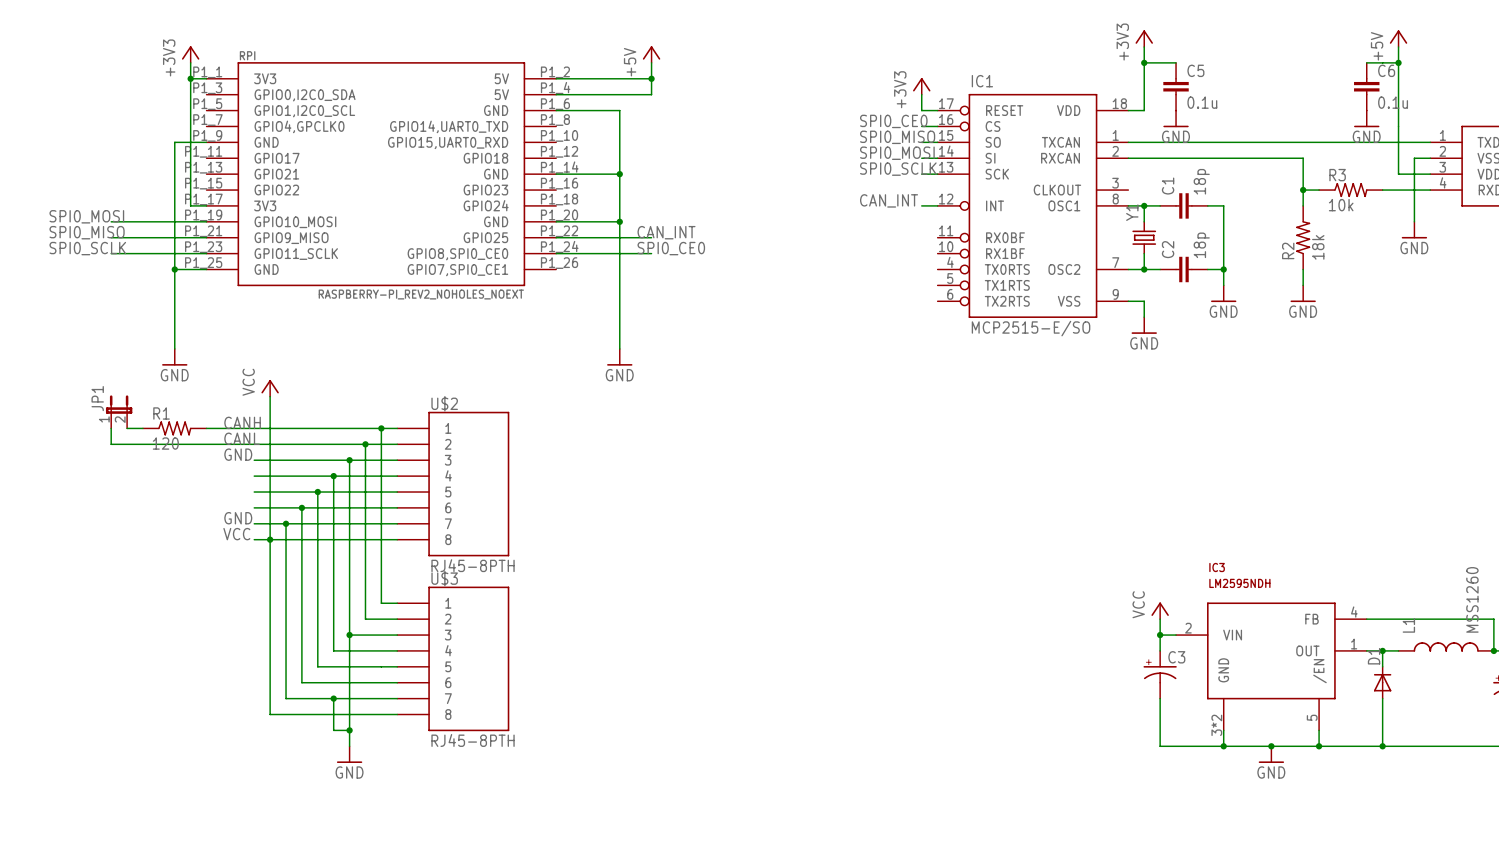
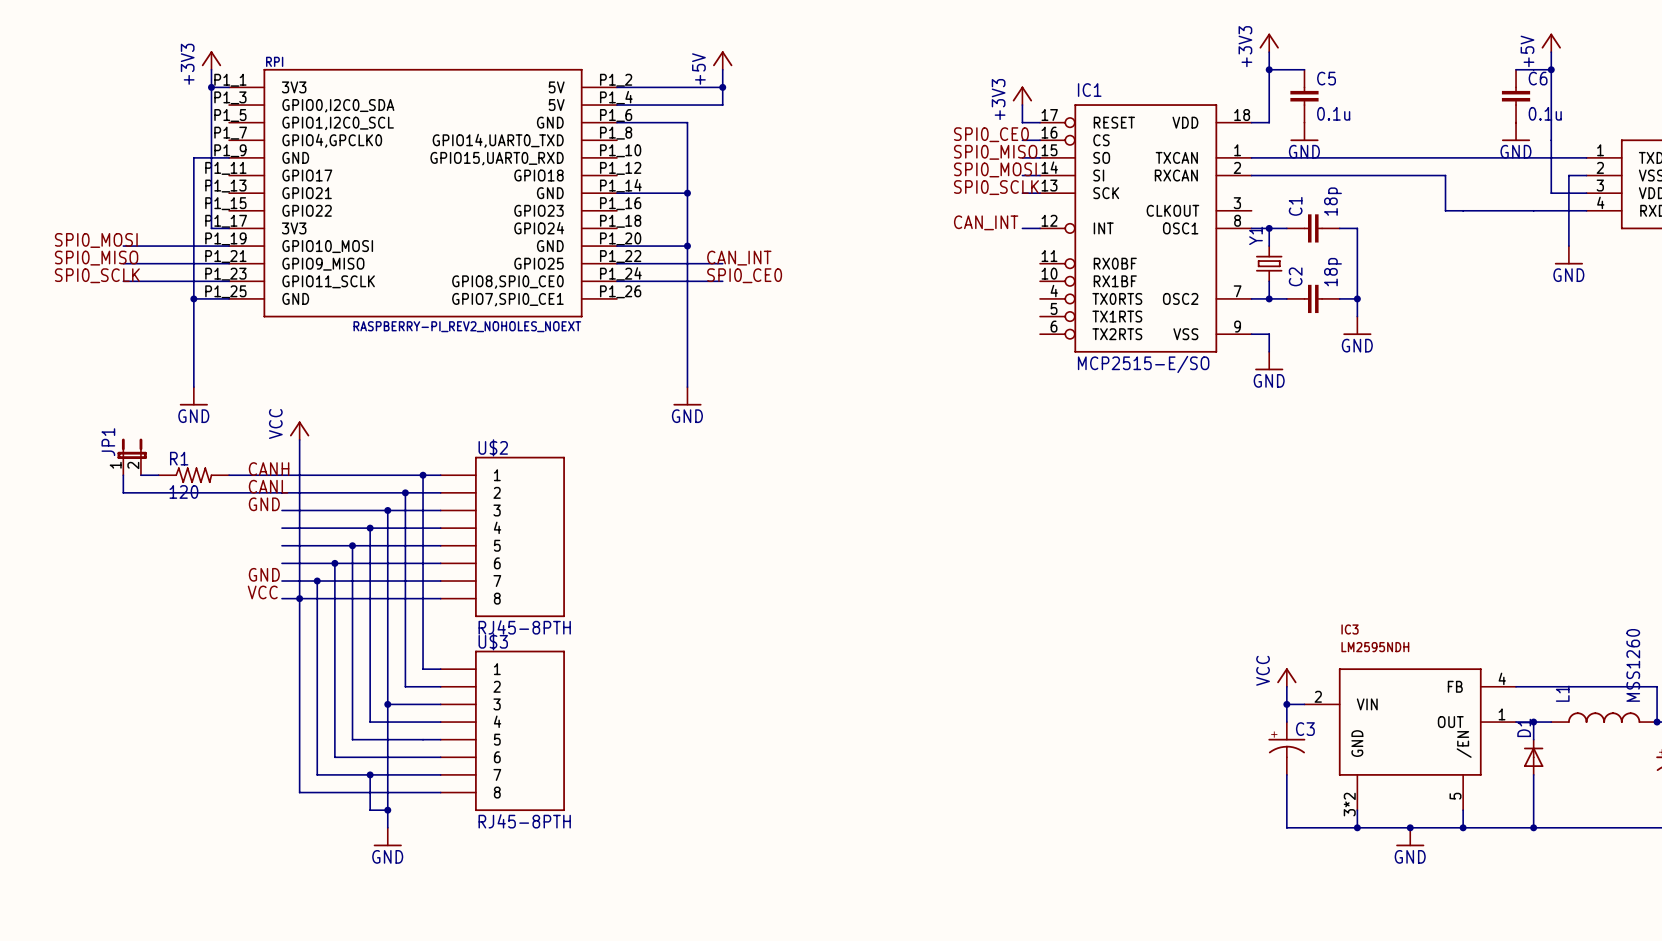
wire: (1303, 190) (1303, 205) -> none
junction: (1303, 190) -> none
R3: 10k (1350, 190) -> none
R2: 18k (1303, 237) -> none
wire: (1303, 269) (1303, 285) -> none
power symbol: GND (1303, 293) -> none

